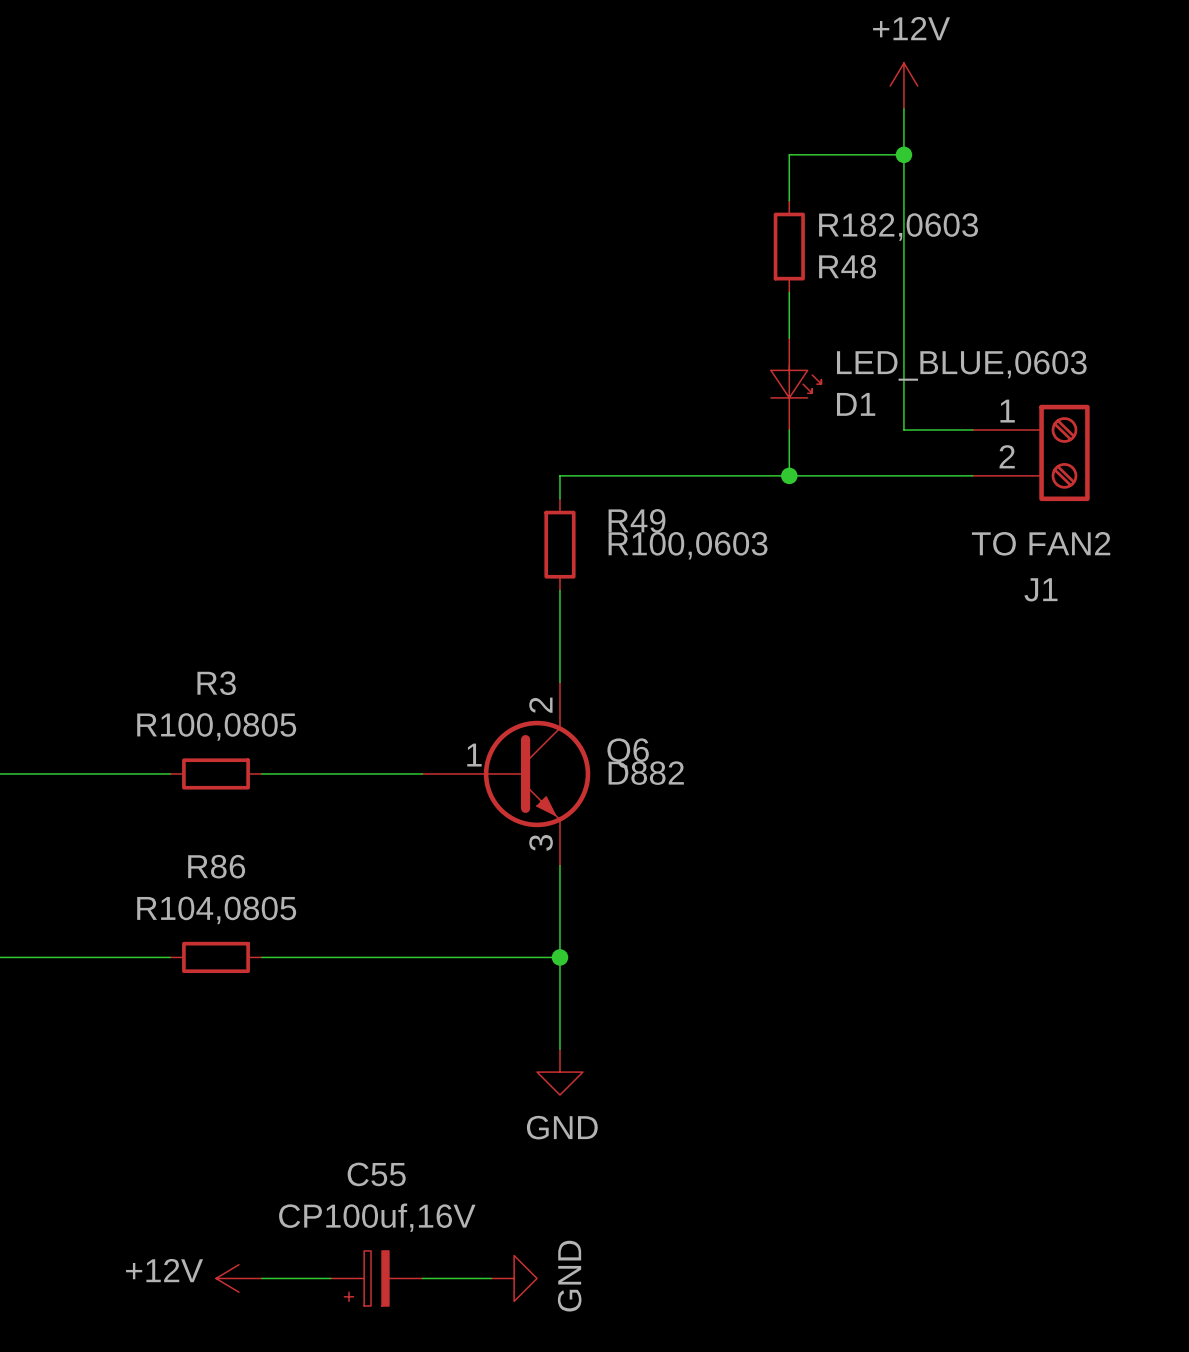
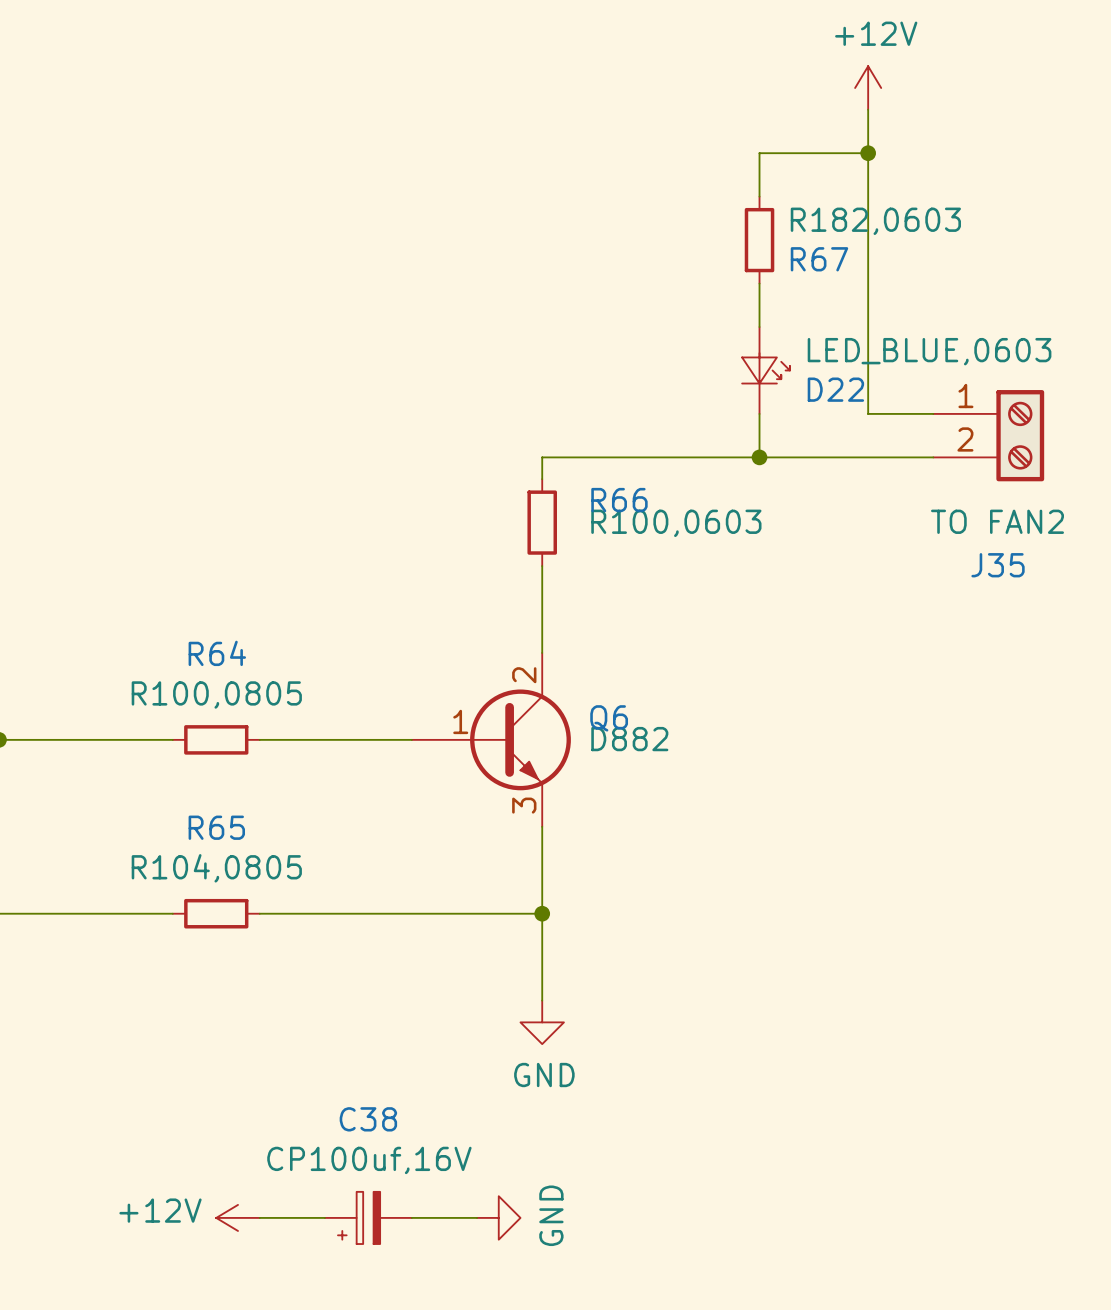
R48 name: R48 (847, 266) -> R67 (819, 259)
D1 name: D1 (856, 404) -> D22 (835, 389)
R49 name: R49 (637, 520) -> R66 (619, 500)
J1 name: J1 (1040, 589) -> J35 (998, 565)
R3 name: R3 (216, 683) -> R64 (217, 653)
R86 name: R86 (216, 866) -> R65 (216, 827)
C55 name: C55 (376, 1174) -> C38 (368, 1119)

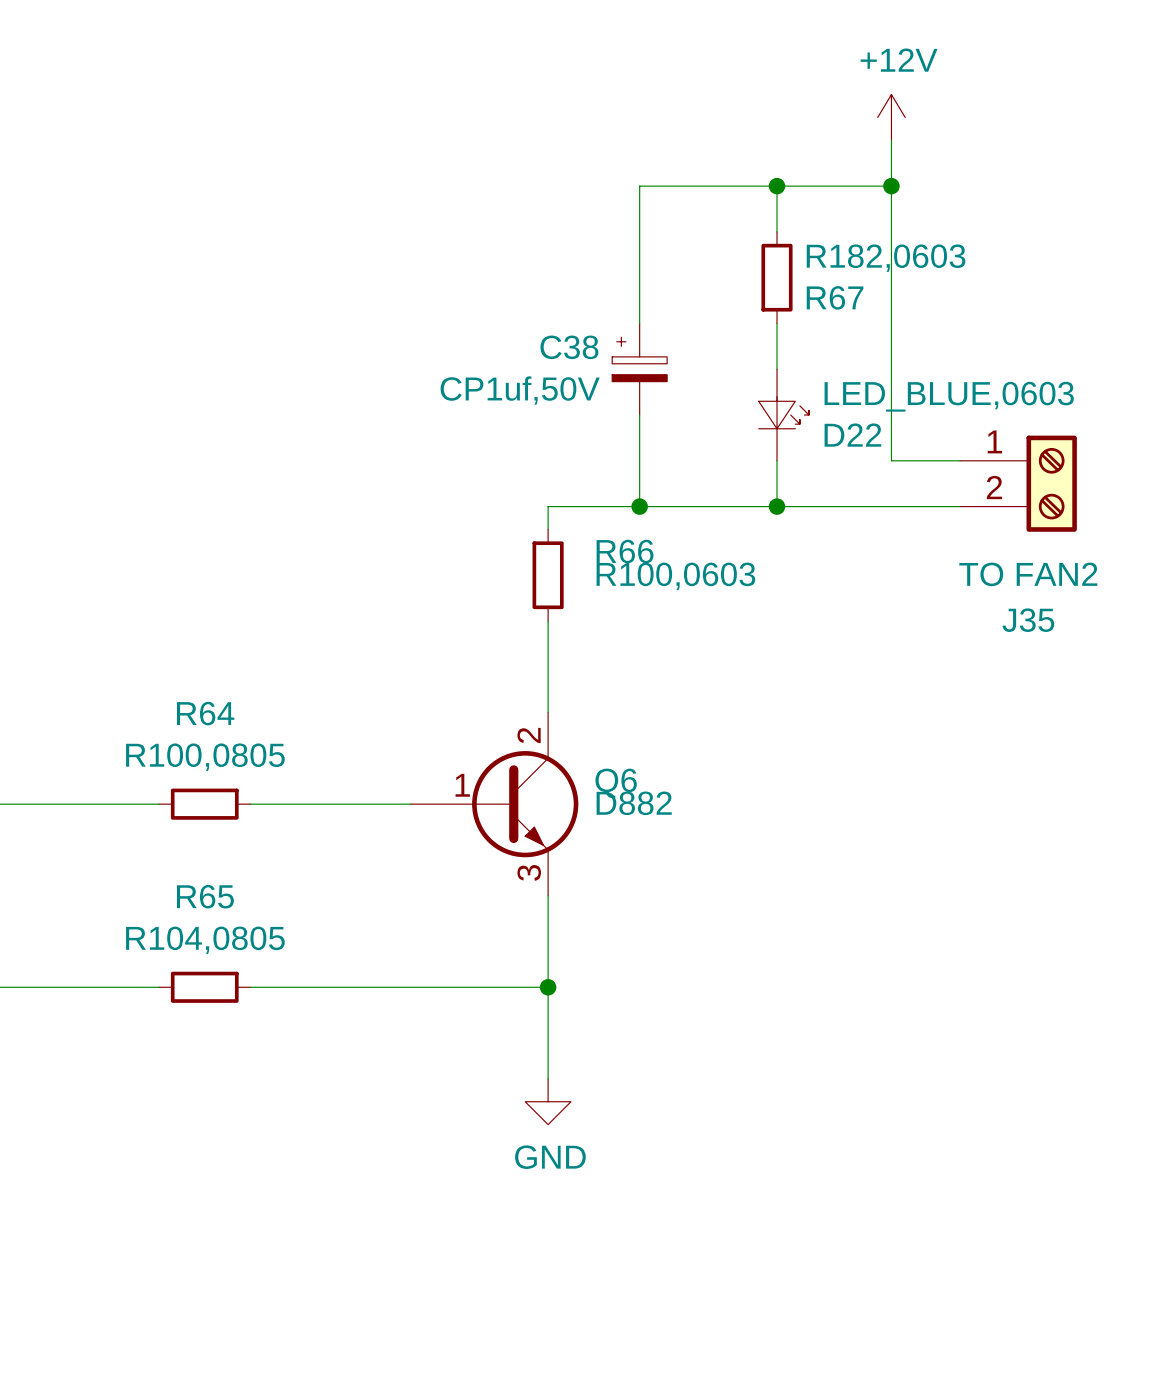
wire: none -> (777, 186) (639, 186) (639, 323)
junction: none -> (777, 186)
wire: none -> (639, 415) (639, 506)
junction: none -> (639, 506)
C38 name position: C38 (368, 1119) -> C38 (569, 347)
C38 value: CP100uf,16V (369, 1160) -> CP1uf,50V (520, 390)
power symbol: +12V (238, 1217) -> none
wire: (259, 1217) (324, 1217) -> none
C38 rotation: 0° (359, 1217) -> 90° clockwise (639, 359)
C38 position: (368, 1217) -> (639, 369)
wire: (411, 1217) (477, 1217) -> none
power symbol: GND (498, 1217) -> none

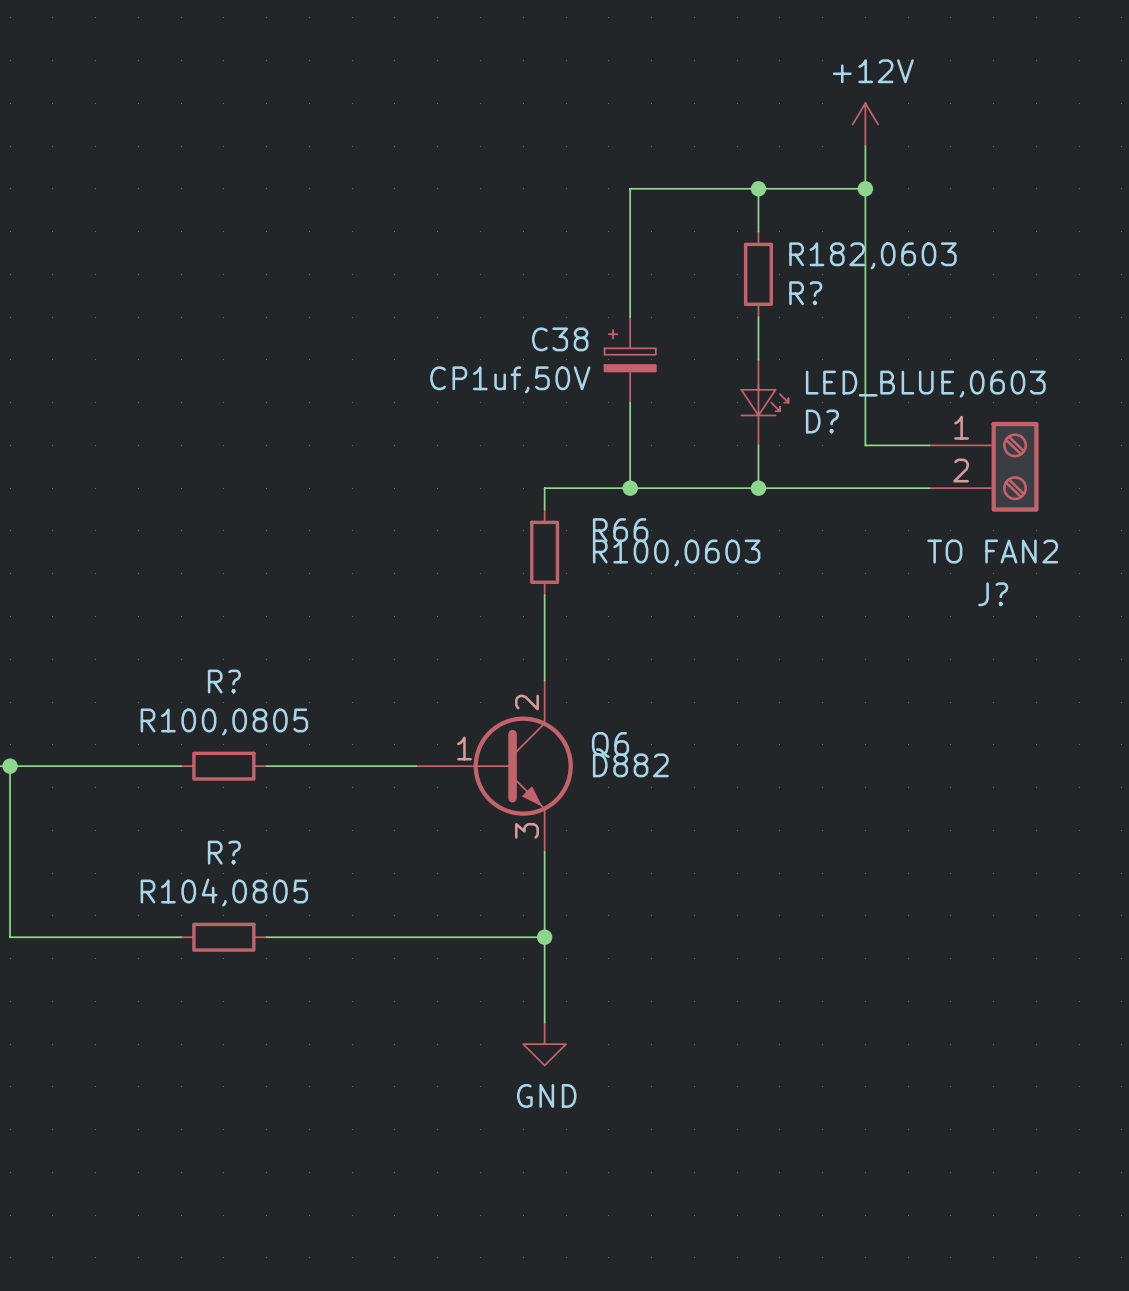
R67 name: R67 (835, 297) -> R? (805, 293)
D22 name: D22 (852, 435) -> D? (822, 421)
J35 name: J35 (1028, 620) -> J? (993, 594)
R64 name: R64 (205, 713) -> R? (224, 681)
R65 name: R65 (205, 896) -> R? (224, 852)

